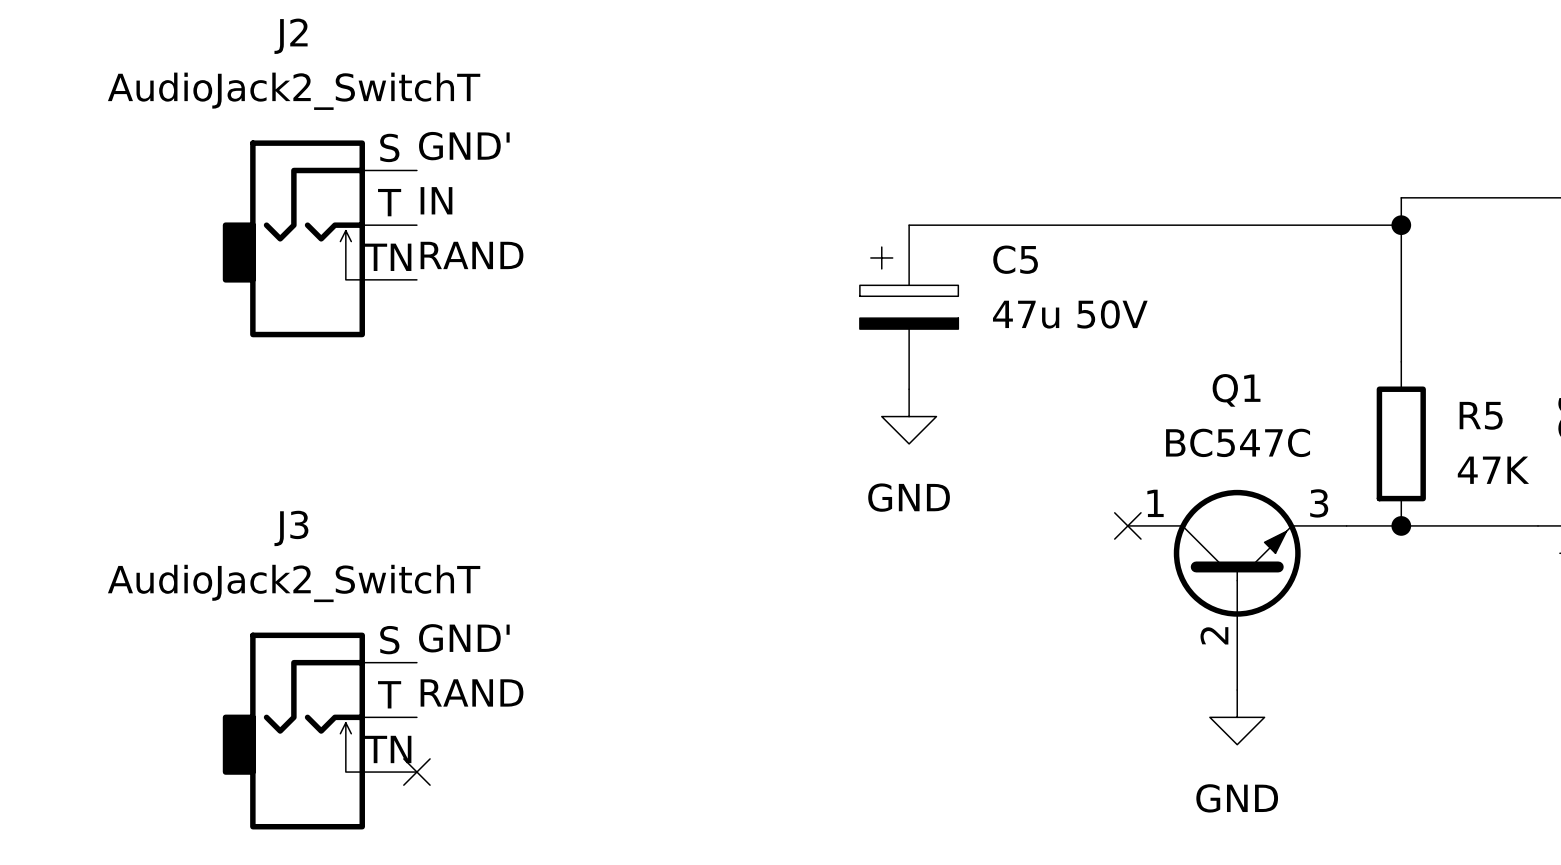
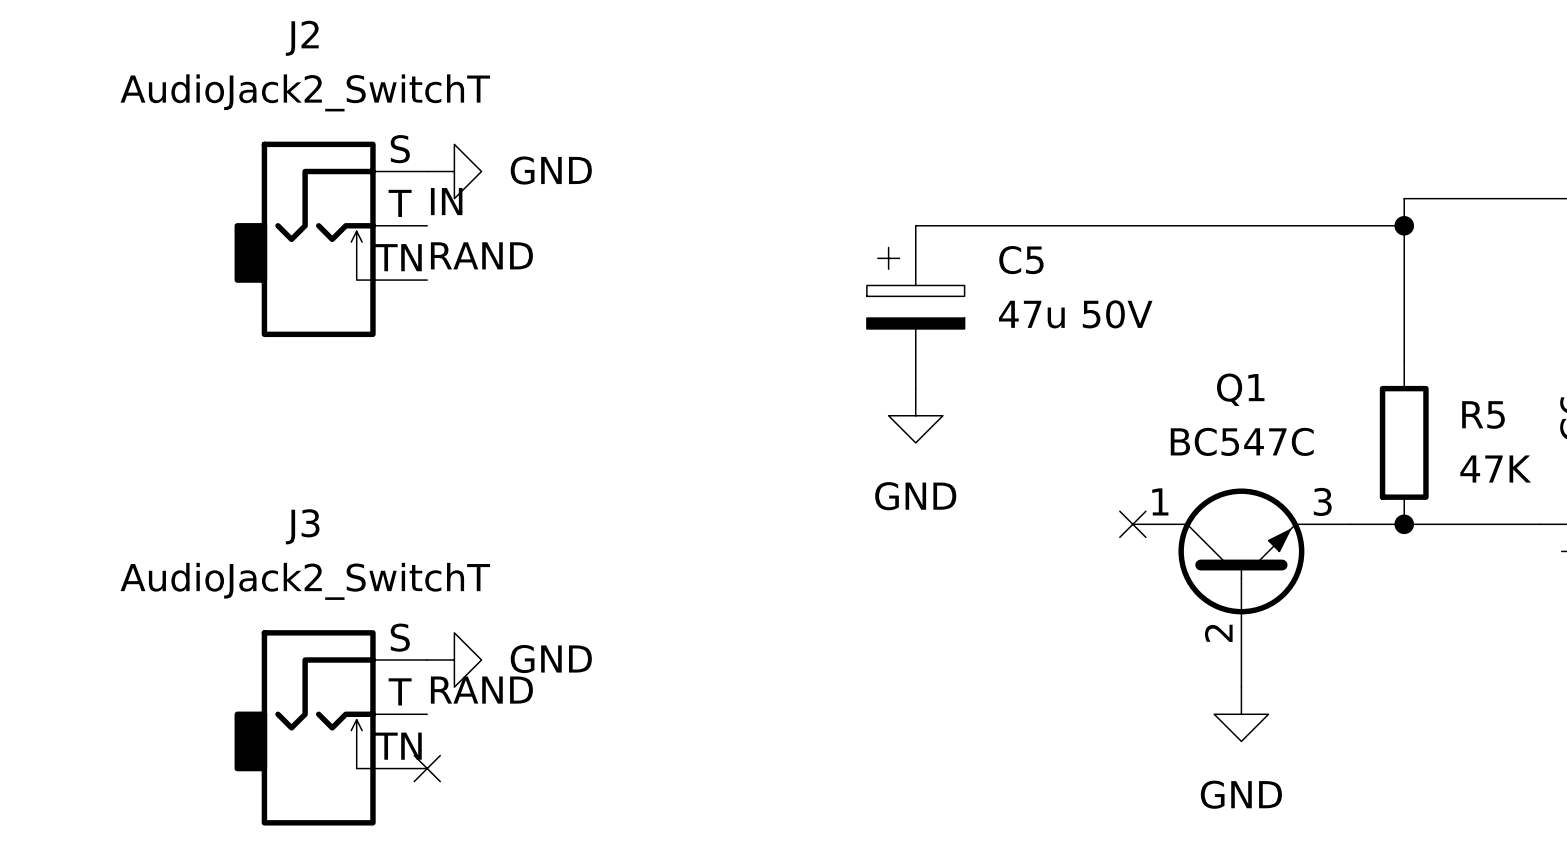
label: GND' (464, 146) -> none
power symbol: none -> GND (454, 171)
label: GND' (464, 638) -> none
power symbol: none -> GND (454, 660)

